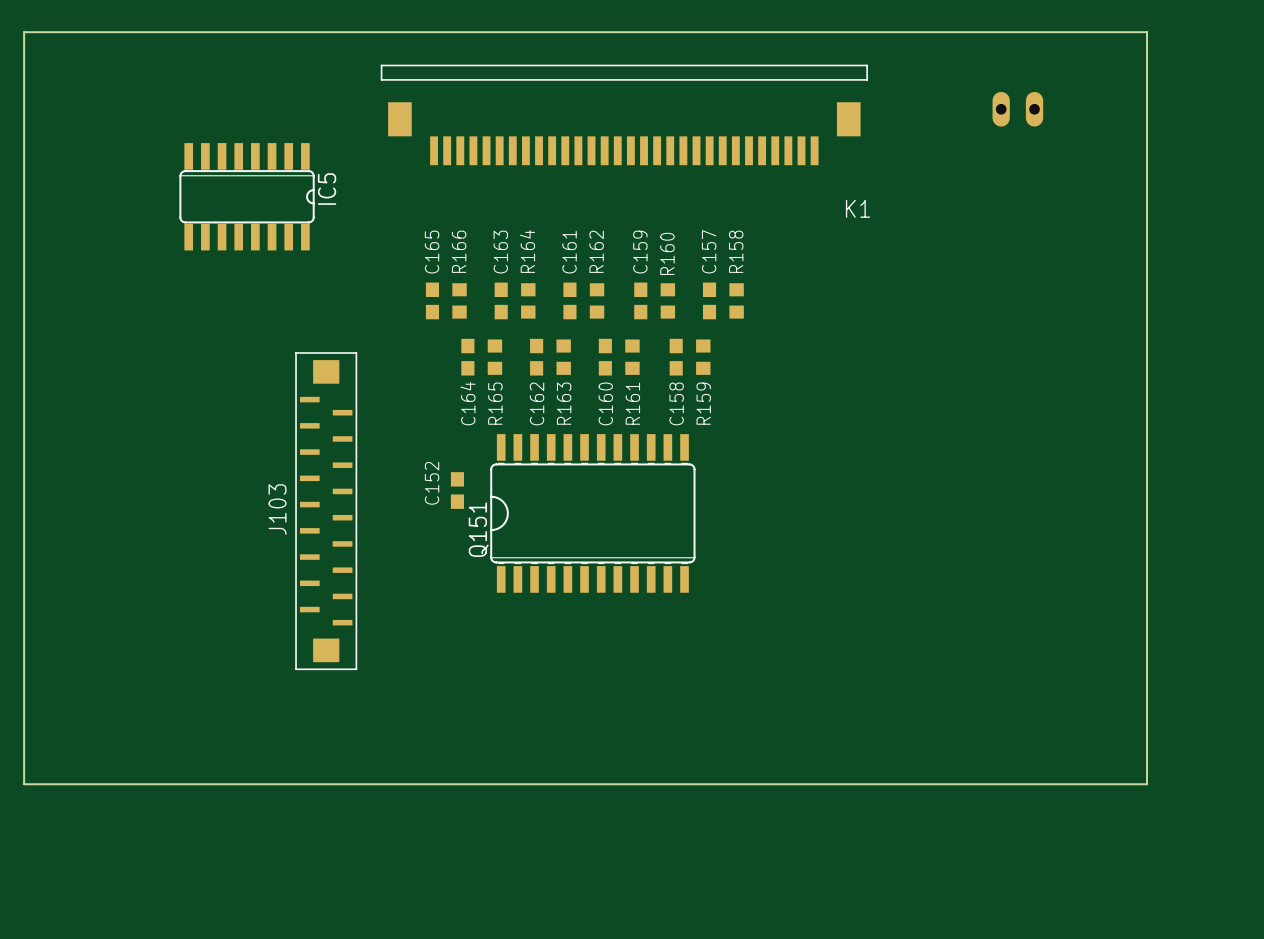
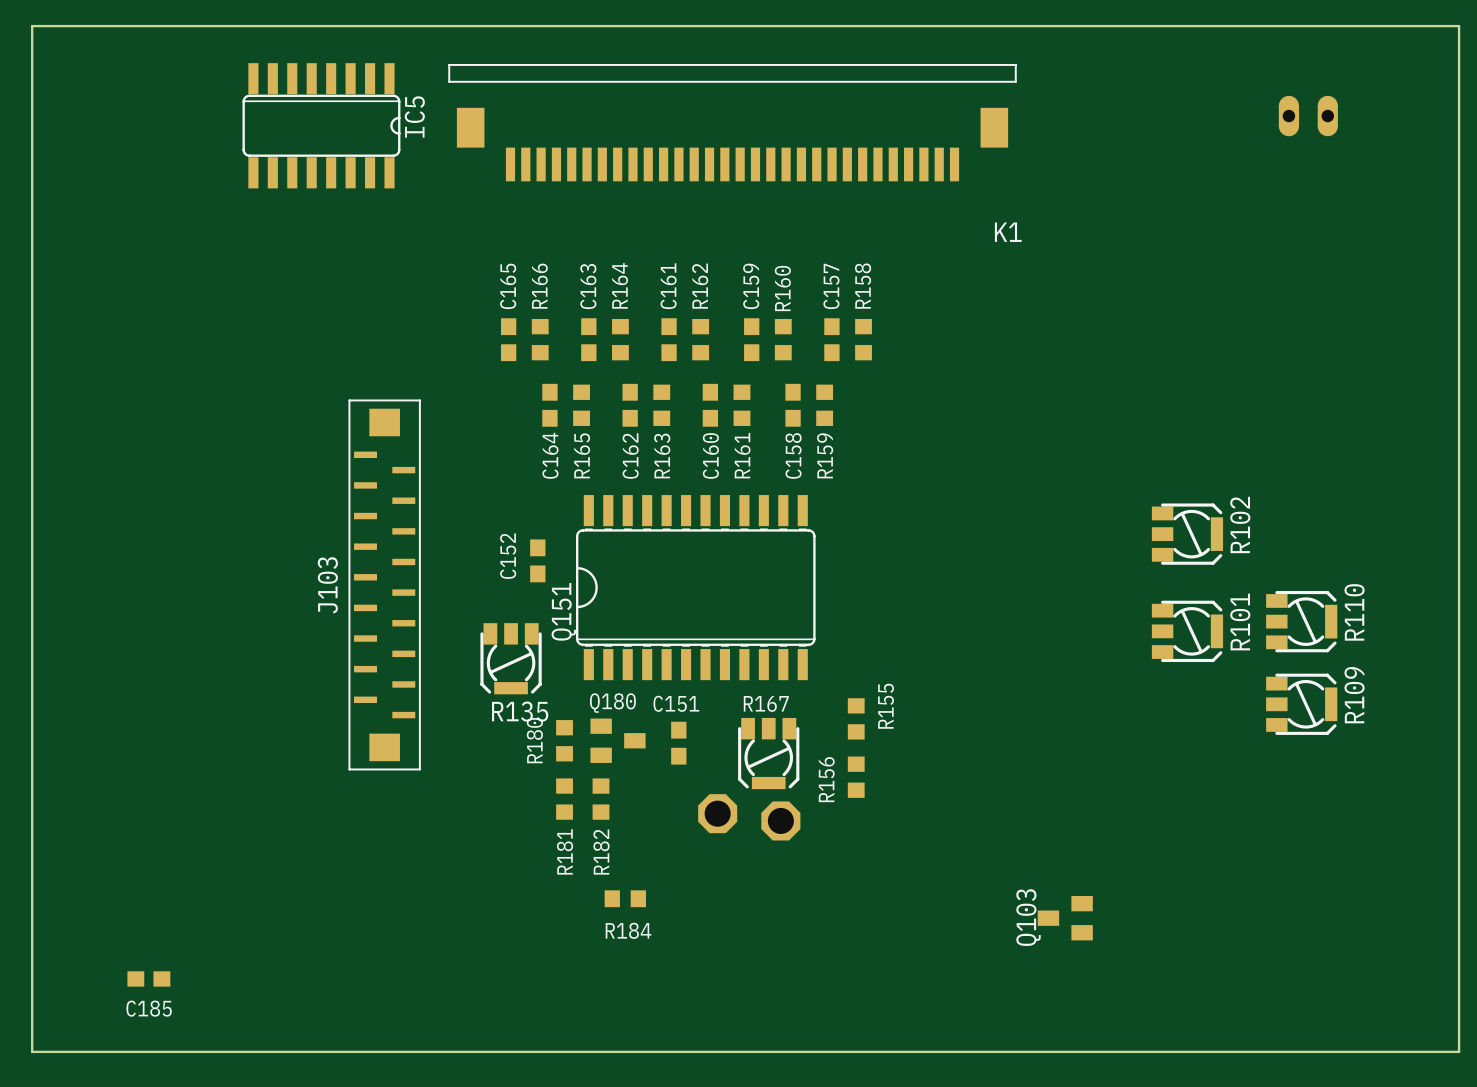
board edge: (1147, 32) (1147, 784) (24, 784) -> (1342, 26) (1459, 26) (1459, 1051) (32, 1051) (32, 903)
part position: (1017, 109) -> (1308, 116)
IC5 position: (247, 196) -> (321, 125)
R102: none -> (1187, 534)
R110: none -> (1301, 621)
R101: none -> (1187, 631)
R135: none -> (511, 658)
R109: none -> (1301, 704)
R155: none -> (856, 718)
R180: none -> (564, 740)
Q180: none -> (618, 740)
C151: none -> (678, 743)
R167: none -> (768, 753)
R156: none -> (856, 777)
R181: none -> (564, 799)
R182: none -> (601, 799)
part: none -> (717, 813)
part: none -> (780, 820)
R184: none -> (625, 898)
Q103: none -> (1065, 918)
C185: none -> (148, 978)

